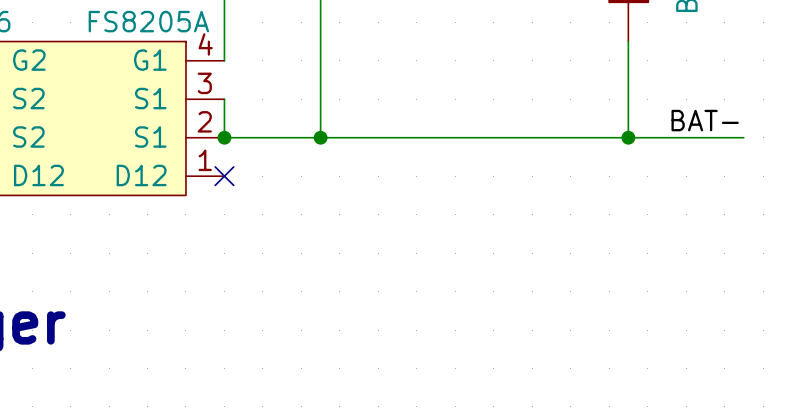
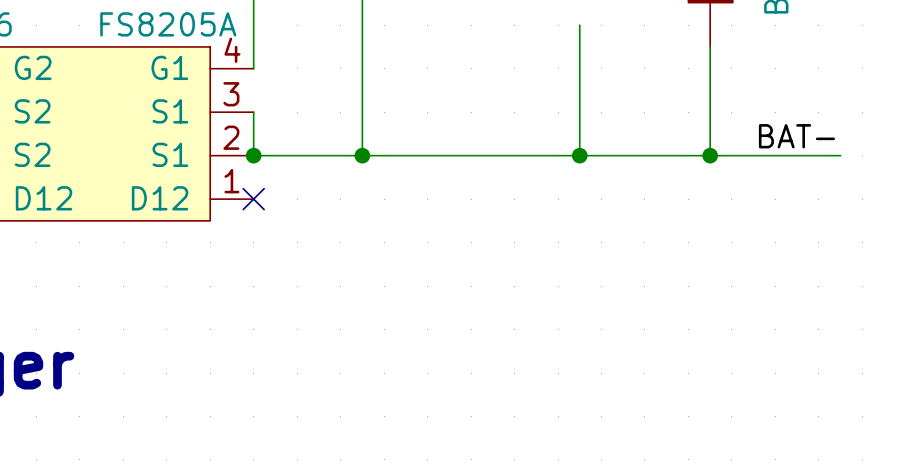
wire: none -> (579, 25) (579, 155)
junction: none -> (579, 155)

